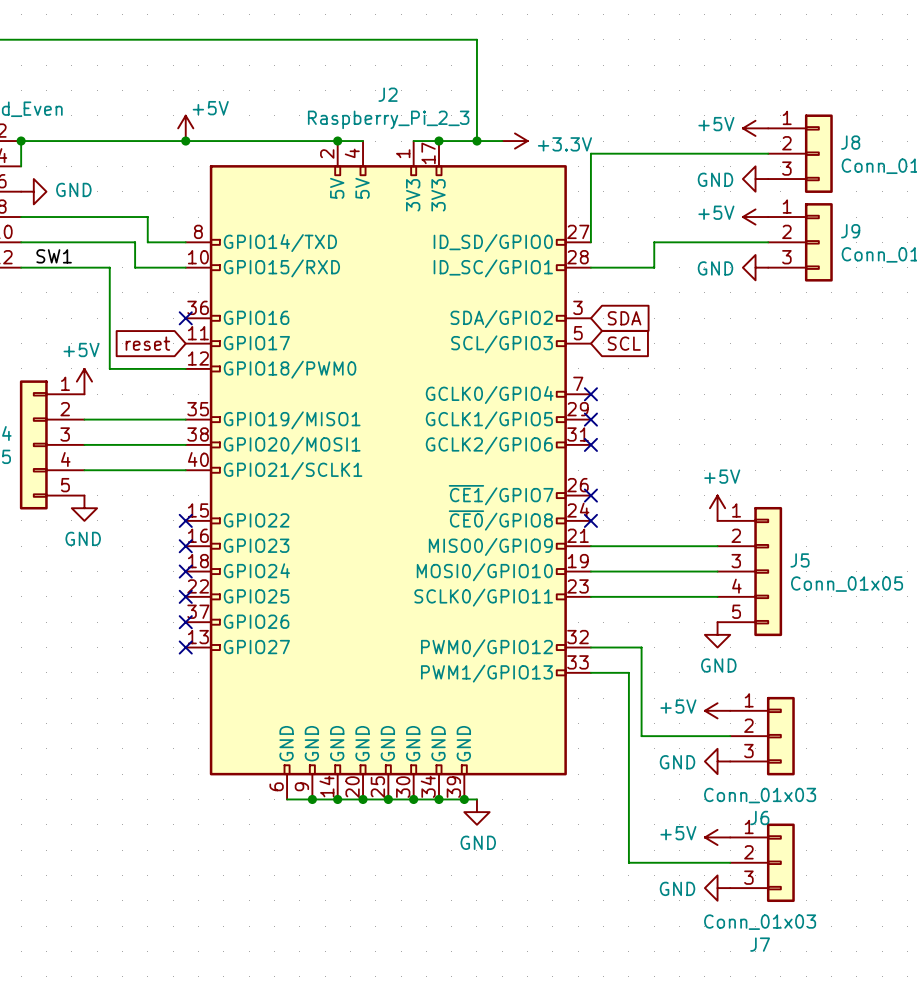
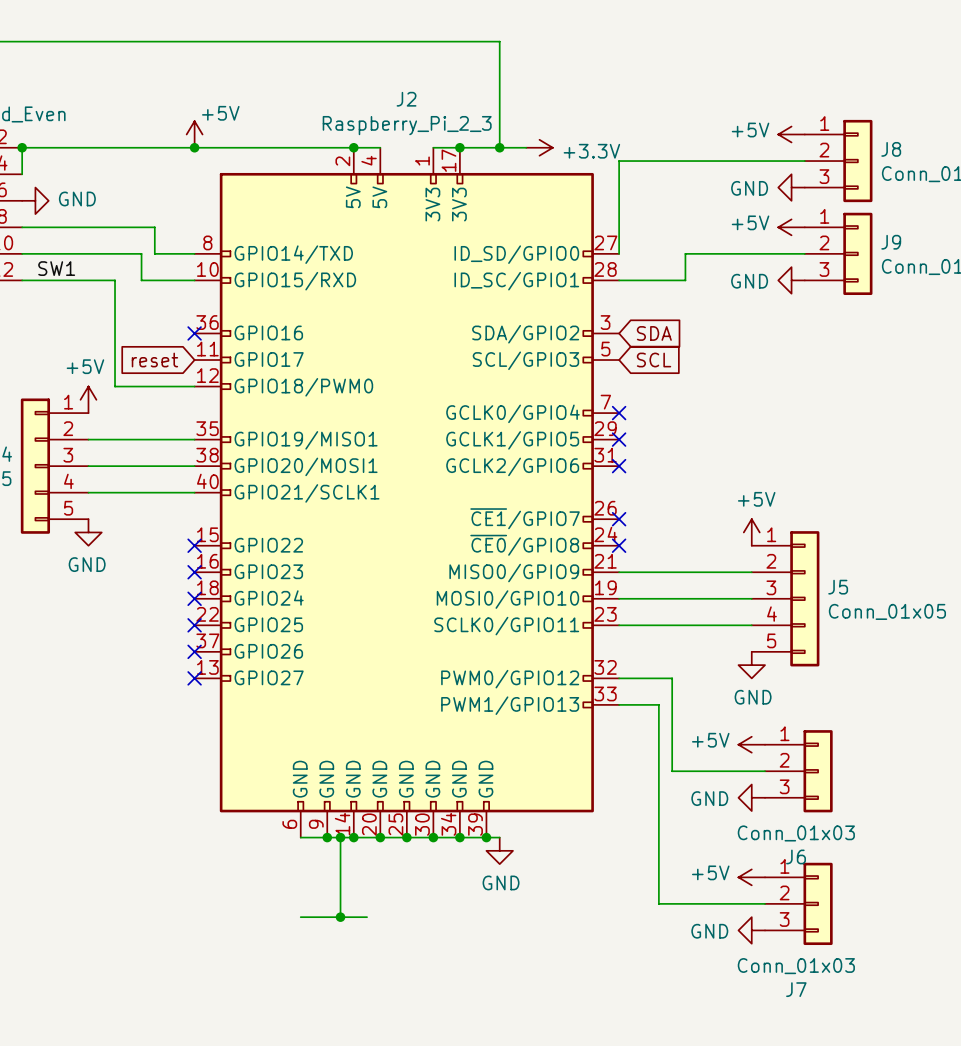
wire: none -> (340, 837) (340, 917)
junction: none -> (340, 837)
wire: none -> (300, 917) (367, 917)
junction: none -> (340, 917)

